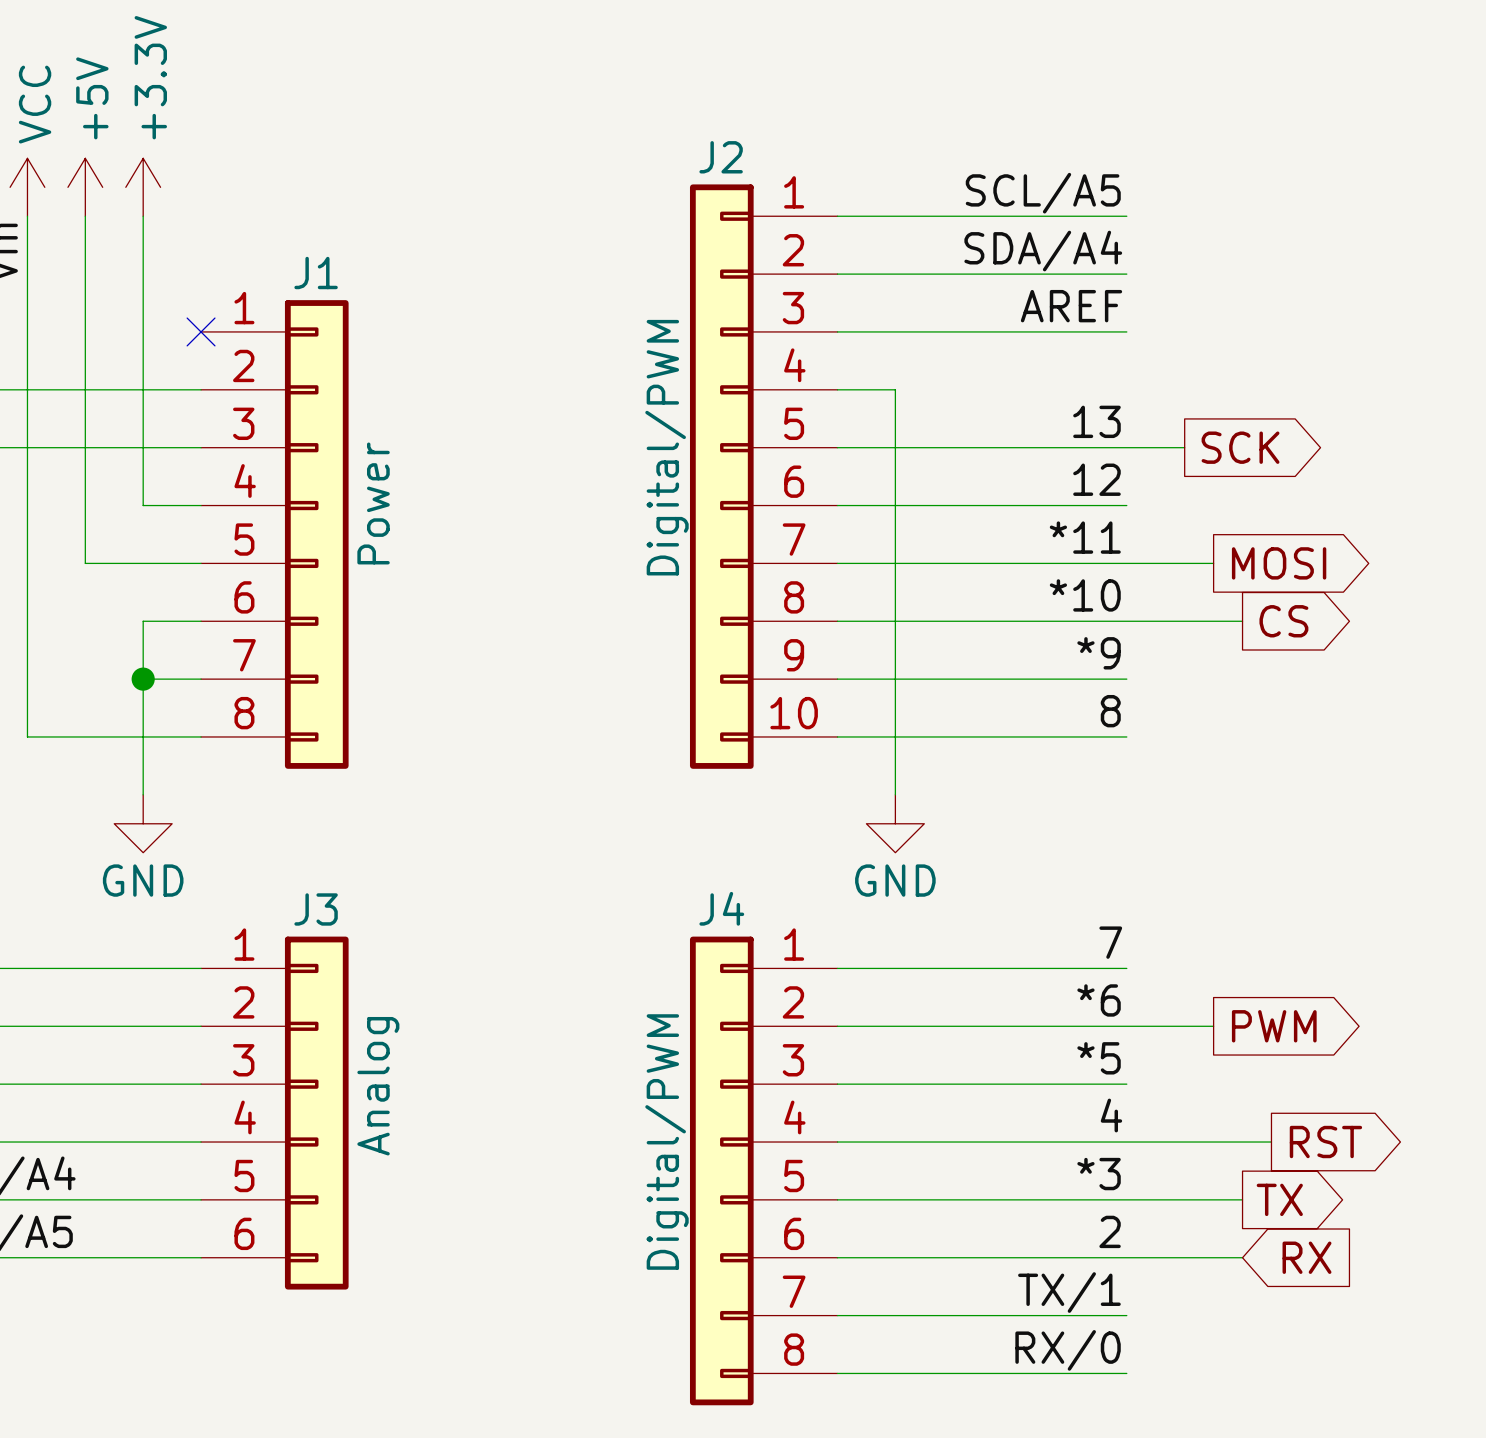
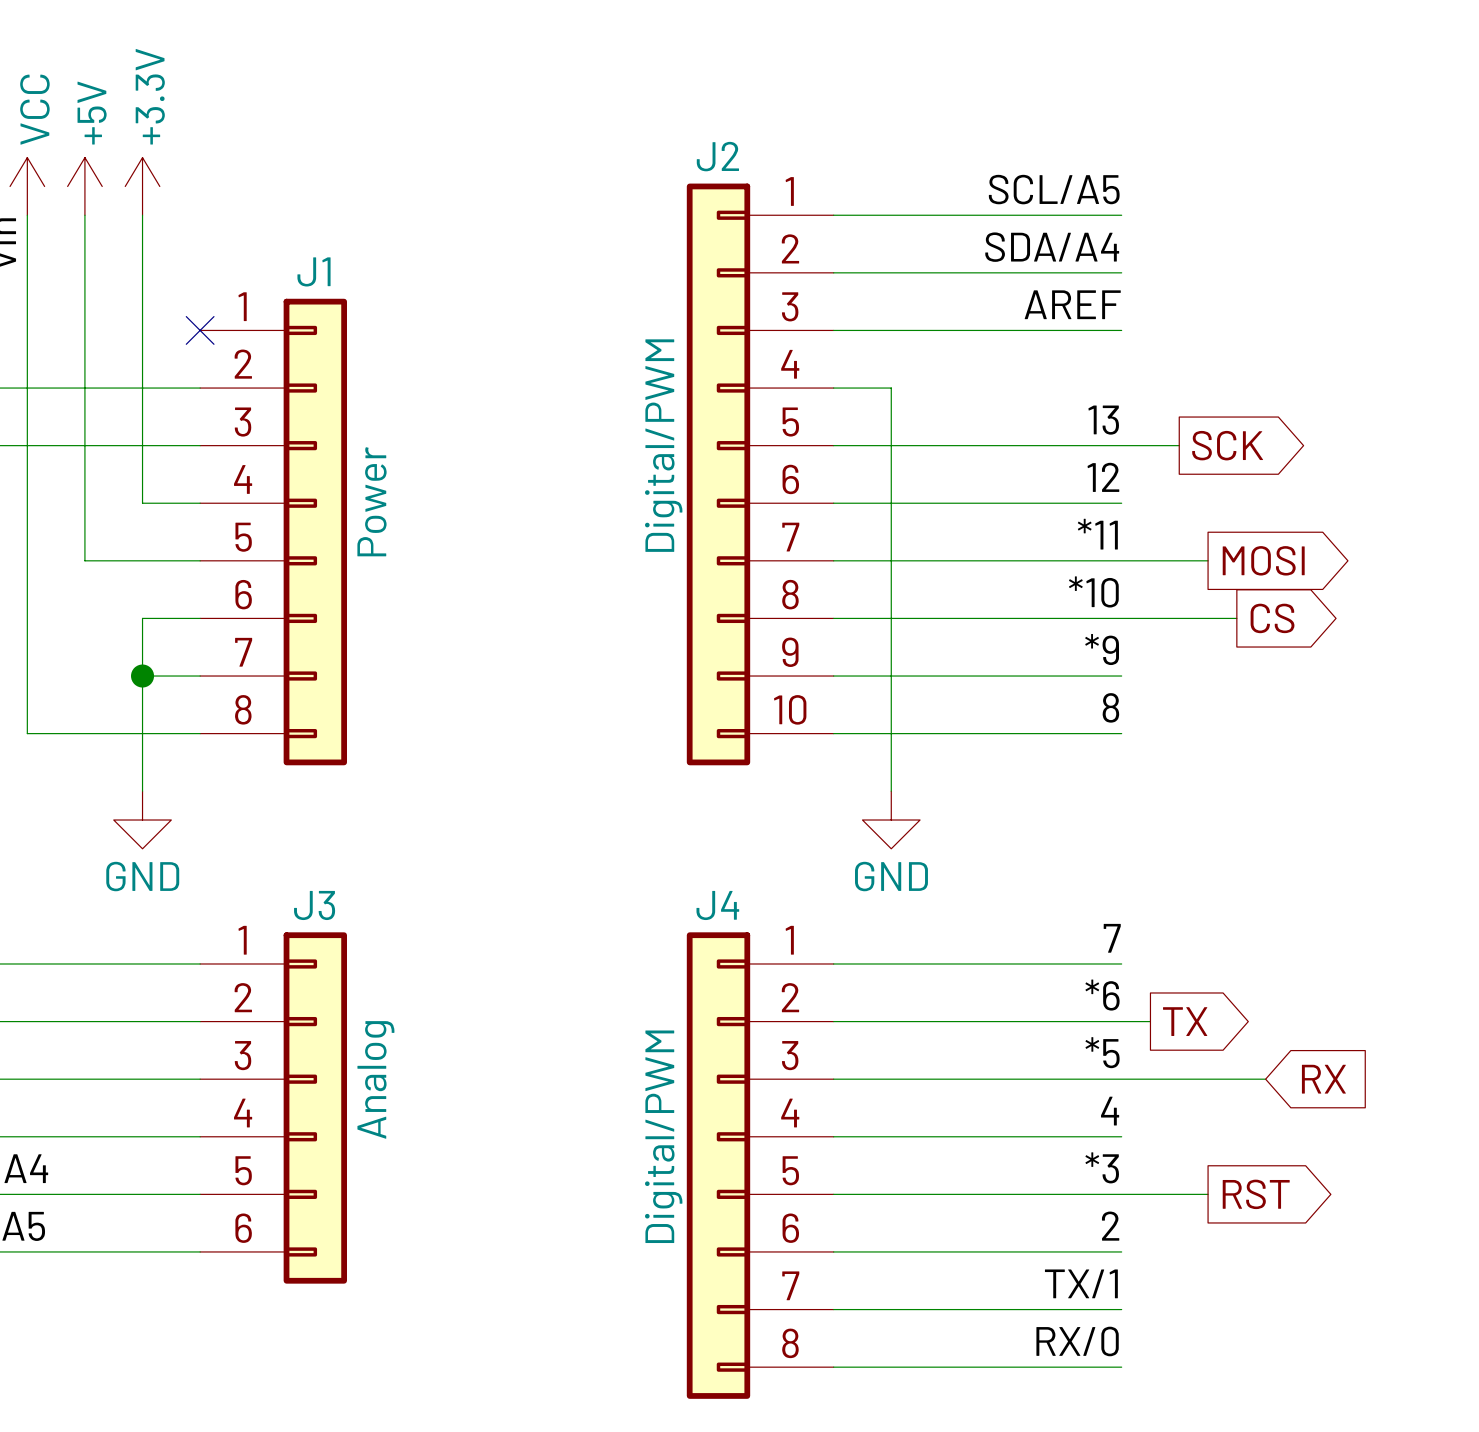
wire: (1155, 1026) (1213, 1026) -> none
global label: PWM (1274, 1026) -> none
wire: (1126, 1142) (1271, 1142) -> (1121, 1079) (1265, 1079)
global label position: RST (1325, 1142) -> RST (1256, 1194)
wire: (1213, 1199) (1242, 1199) -> none
global label position: TX (1279, 1199) -> TX (1185, 1021)
wire: (1126, 1257) (1242, 1257) -> none
global label position: RX (1306, 1257) -> RX (1323, 1079)

